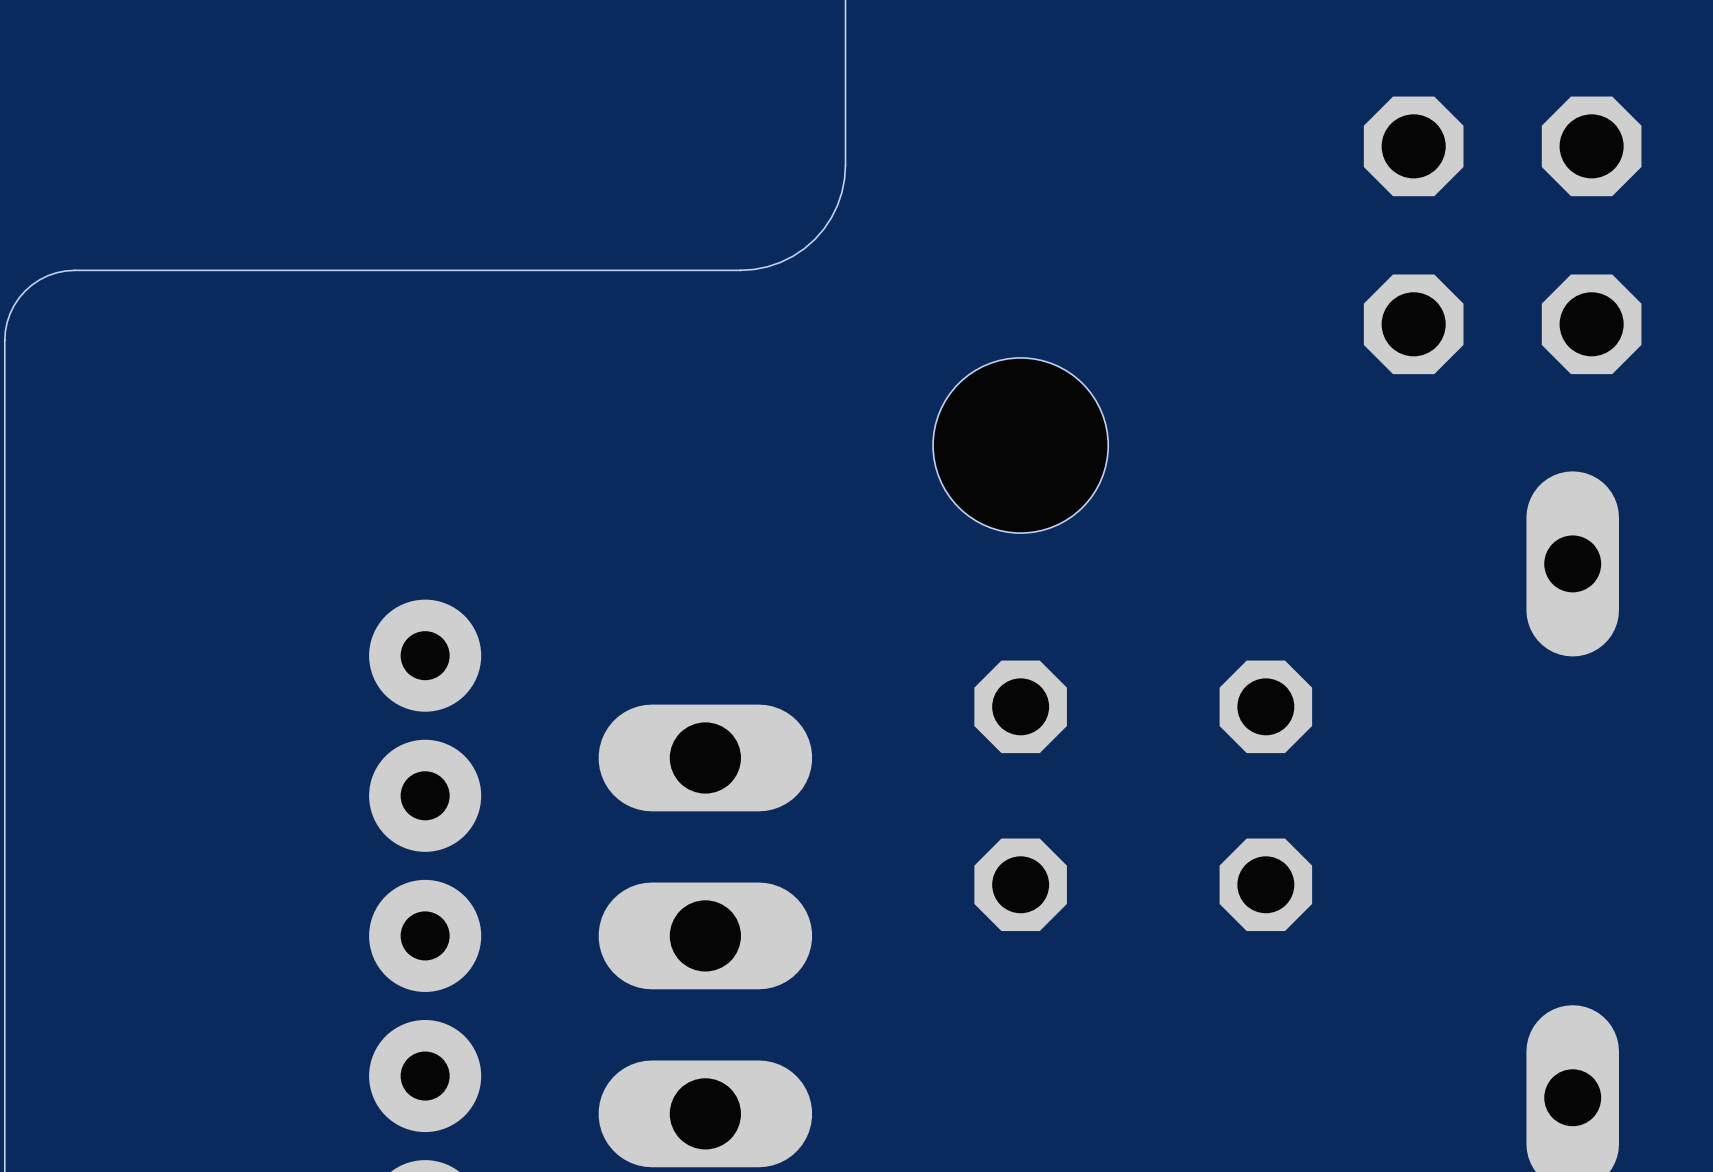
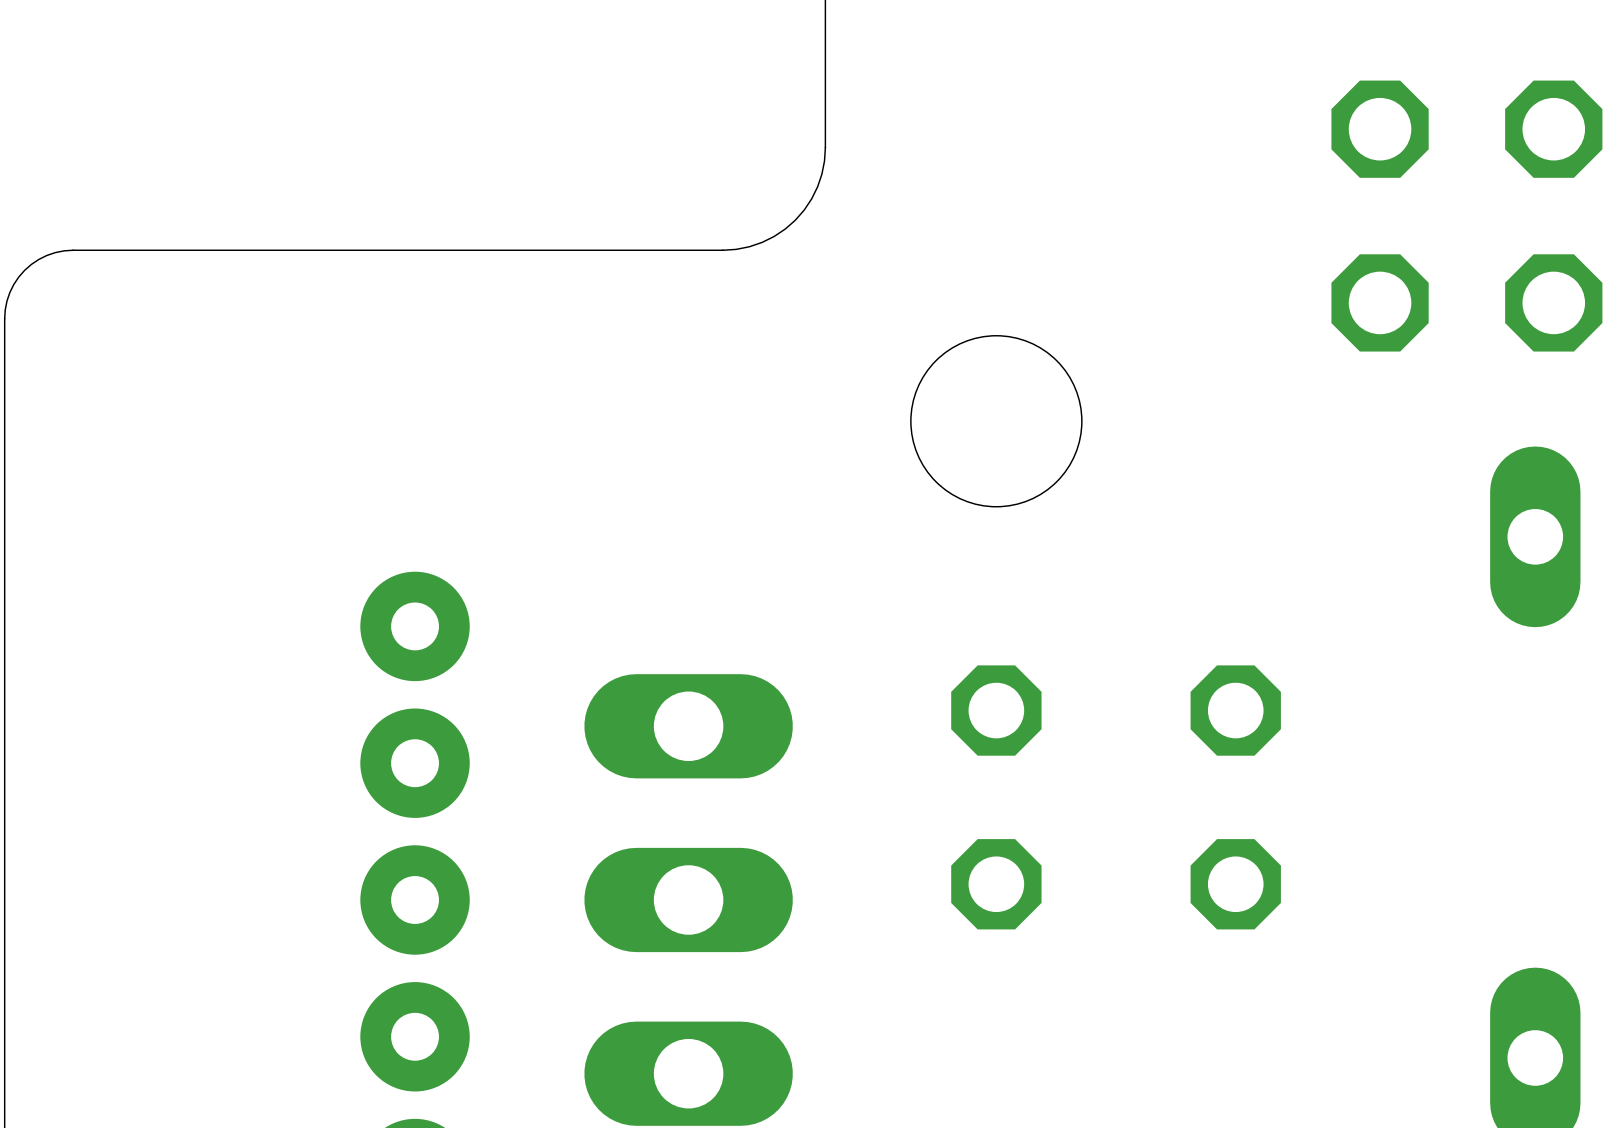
part position: (1020, 795) -> (996, 797)
part position: (1265, 795) -> (1235, 797)

